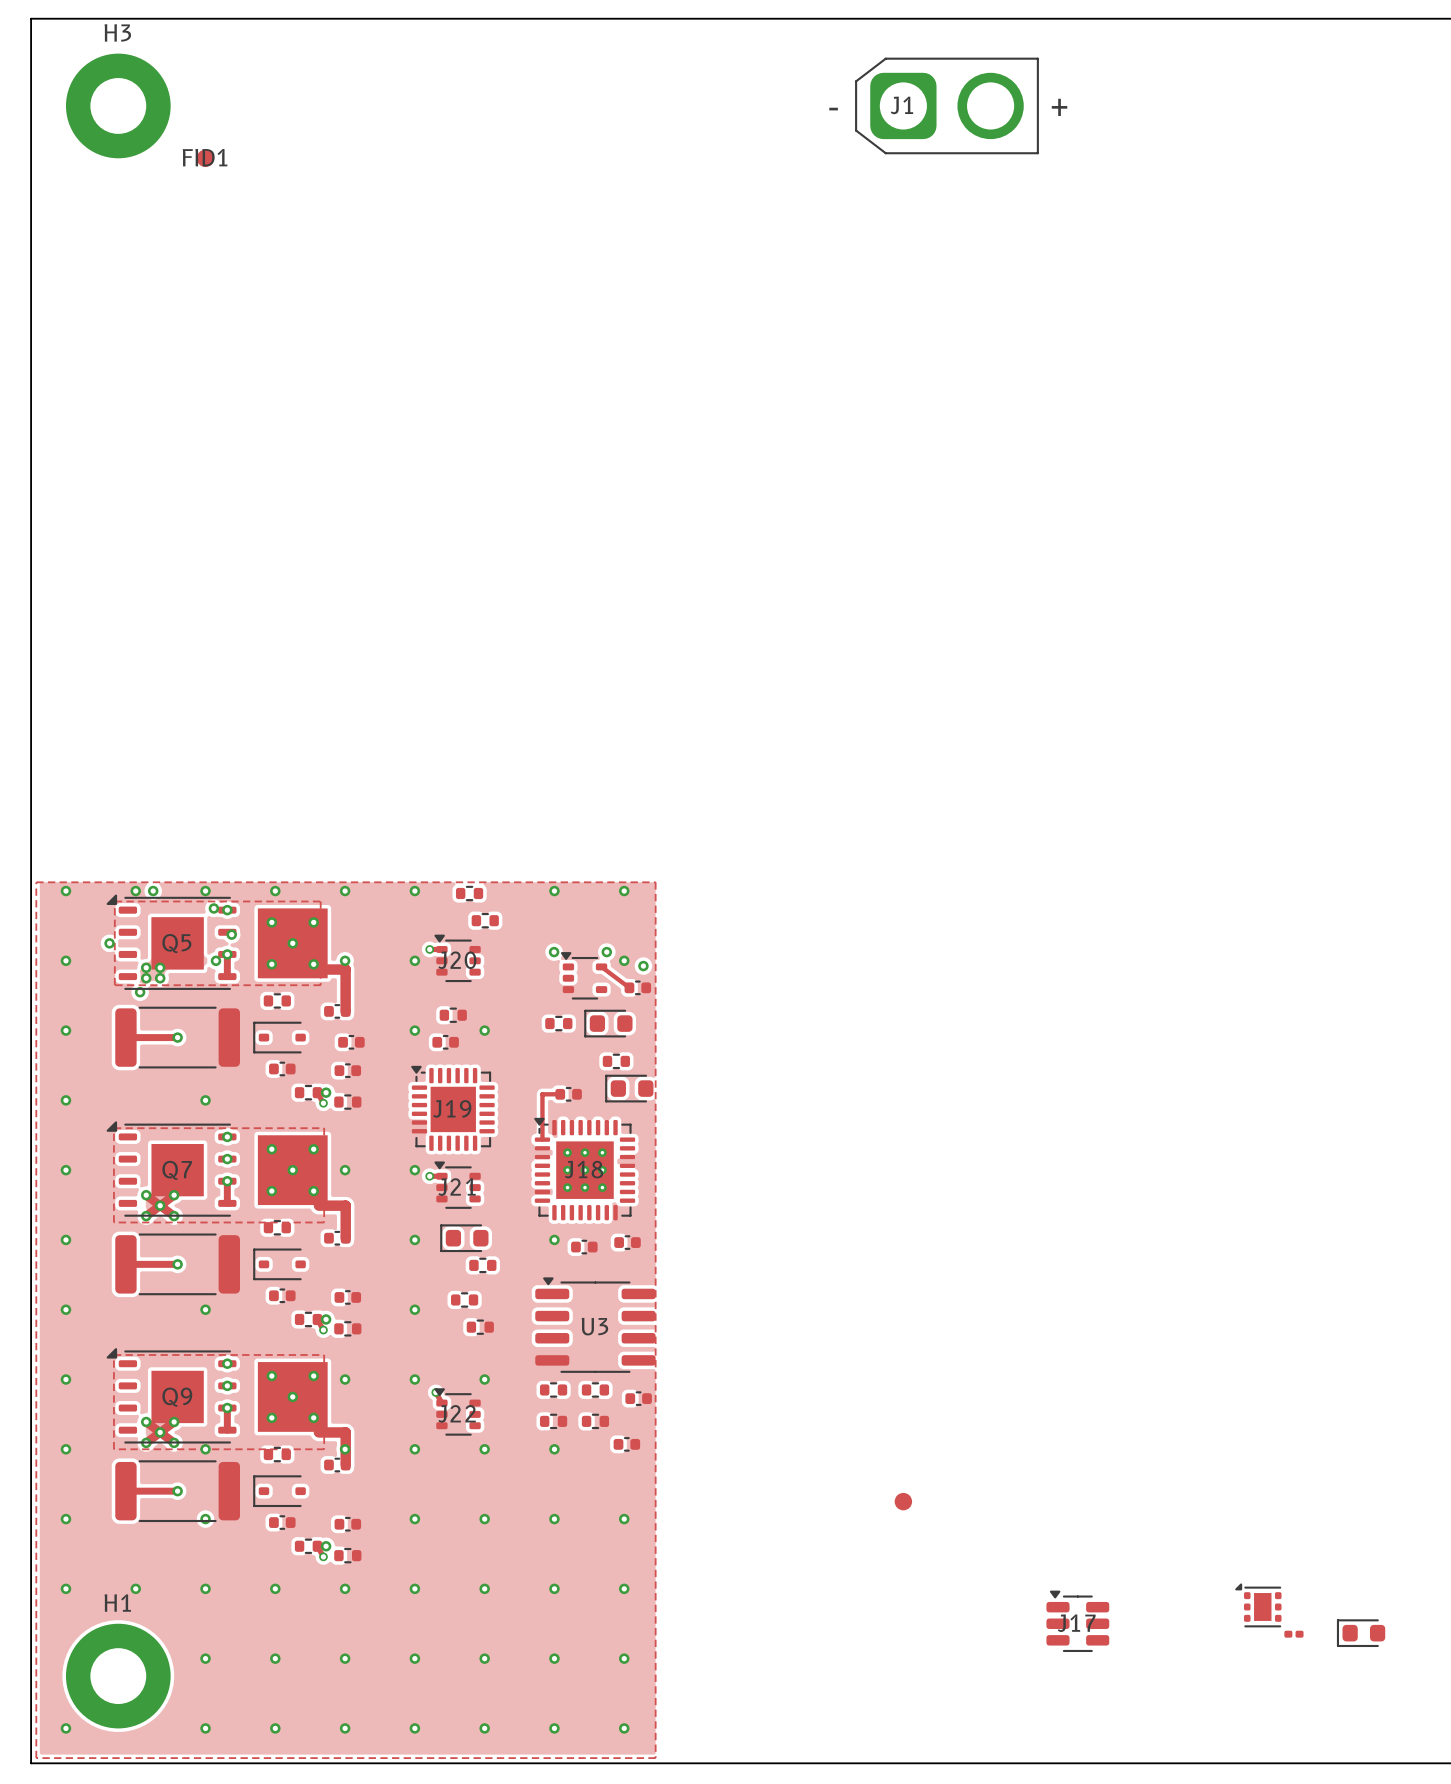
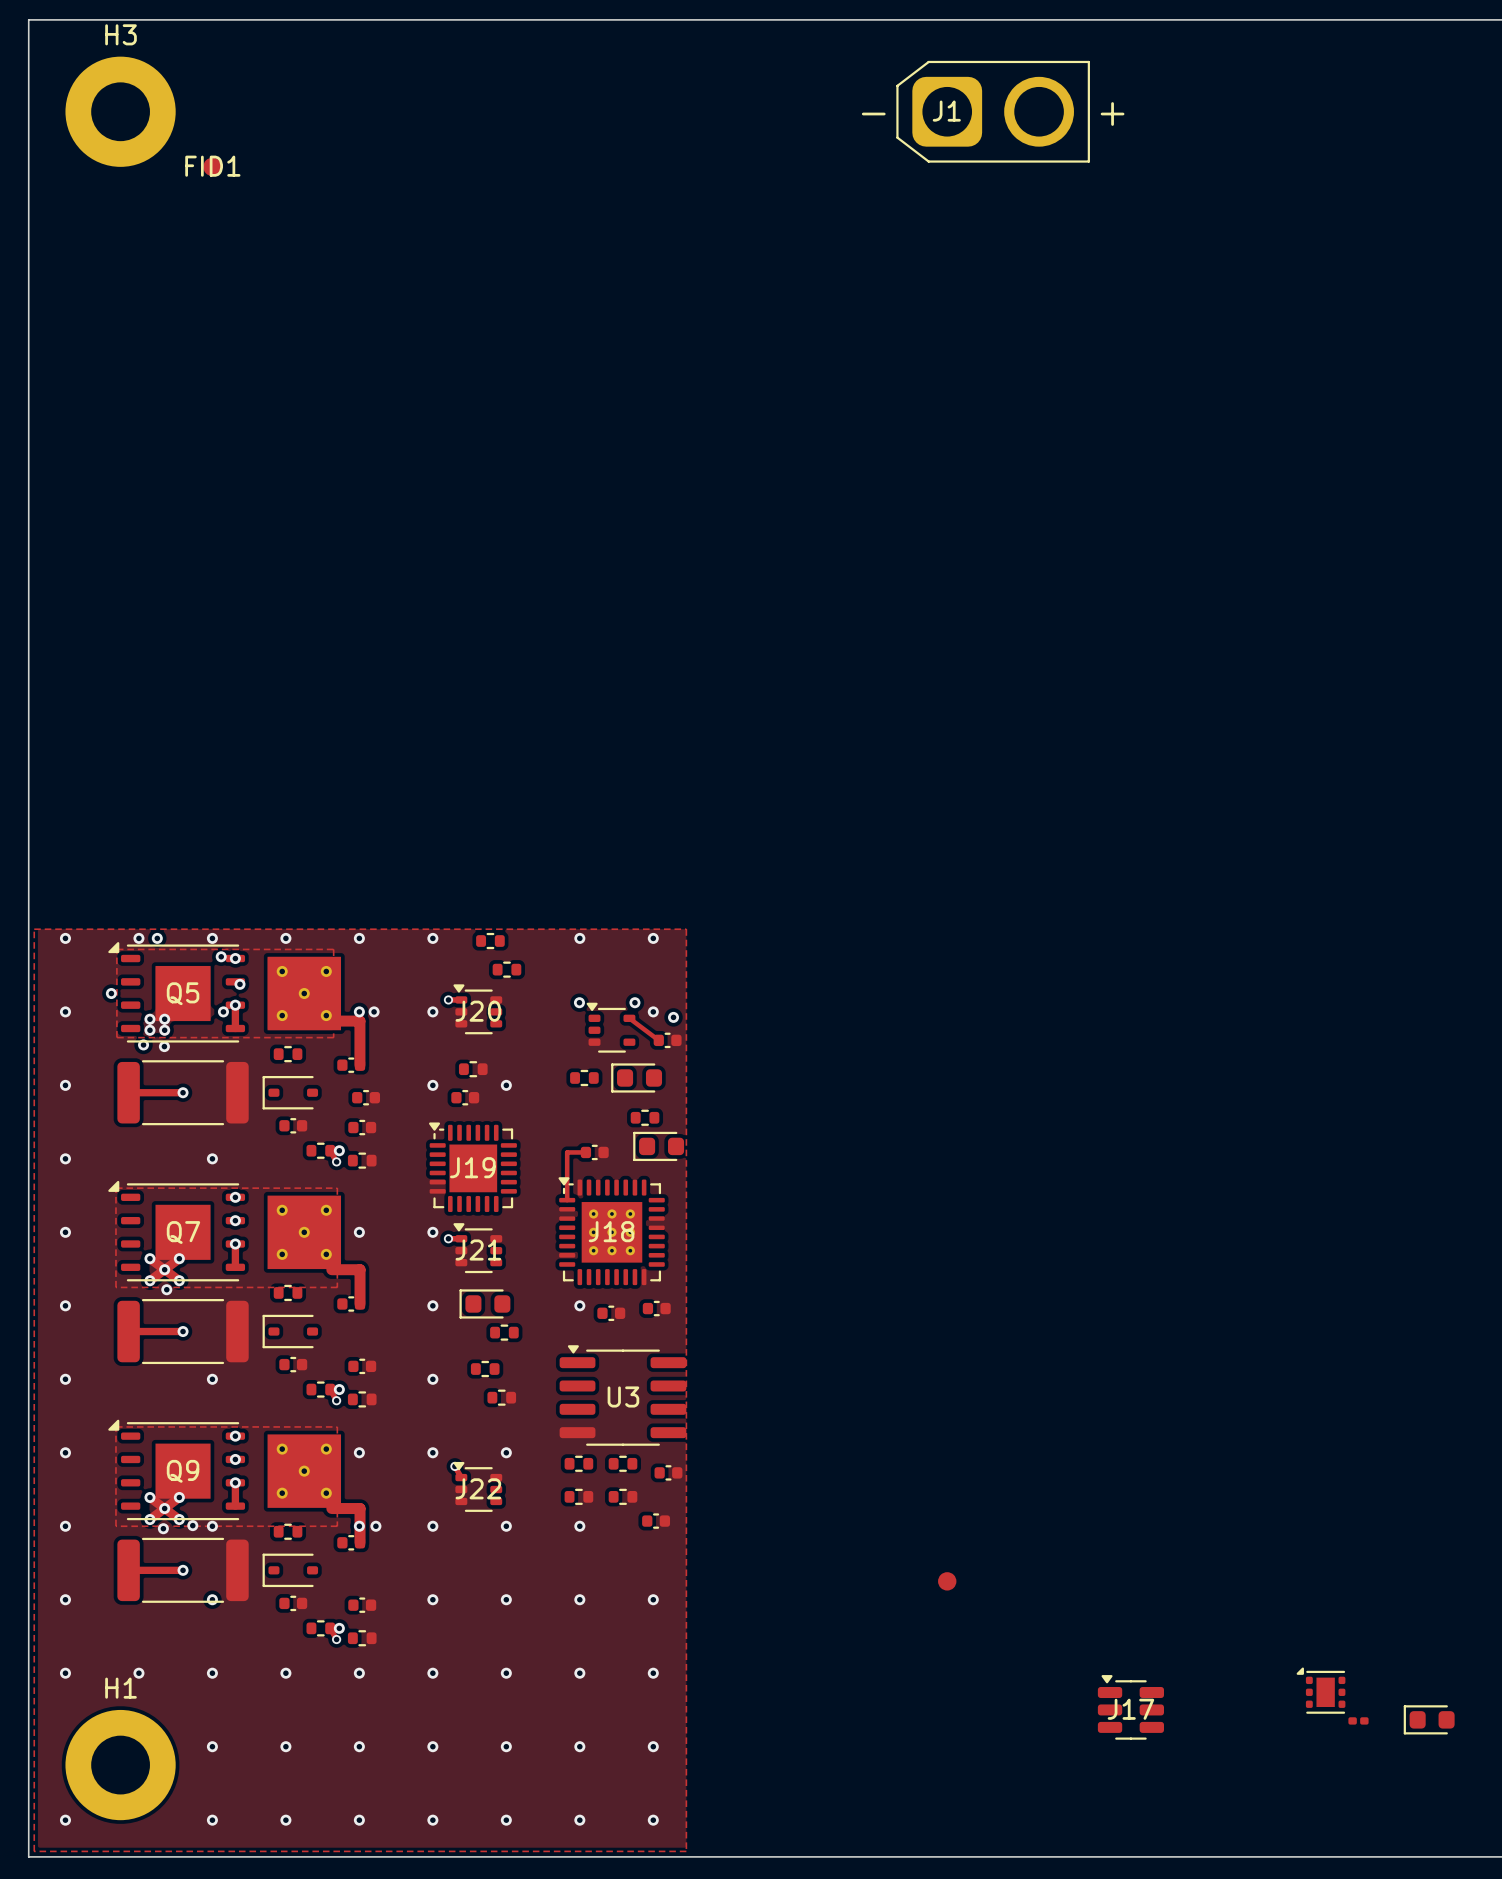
via: none -> (374, 1011)
via: none -> (164, 1046)
via: none -> (166, 1289)
via: none -> (192, 1525)
via: none -> (375, 1526)
via: none -> (163, 1528)

